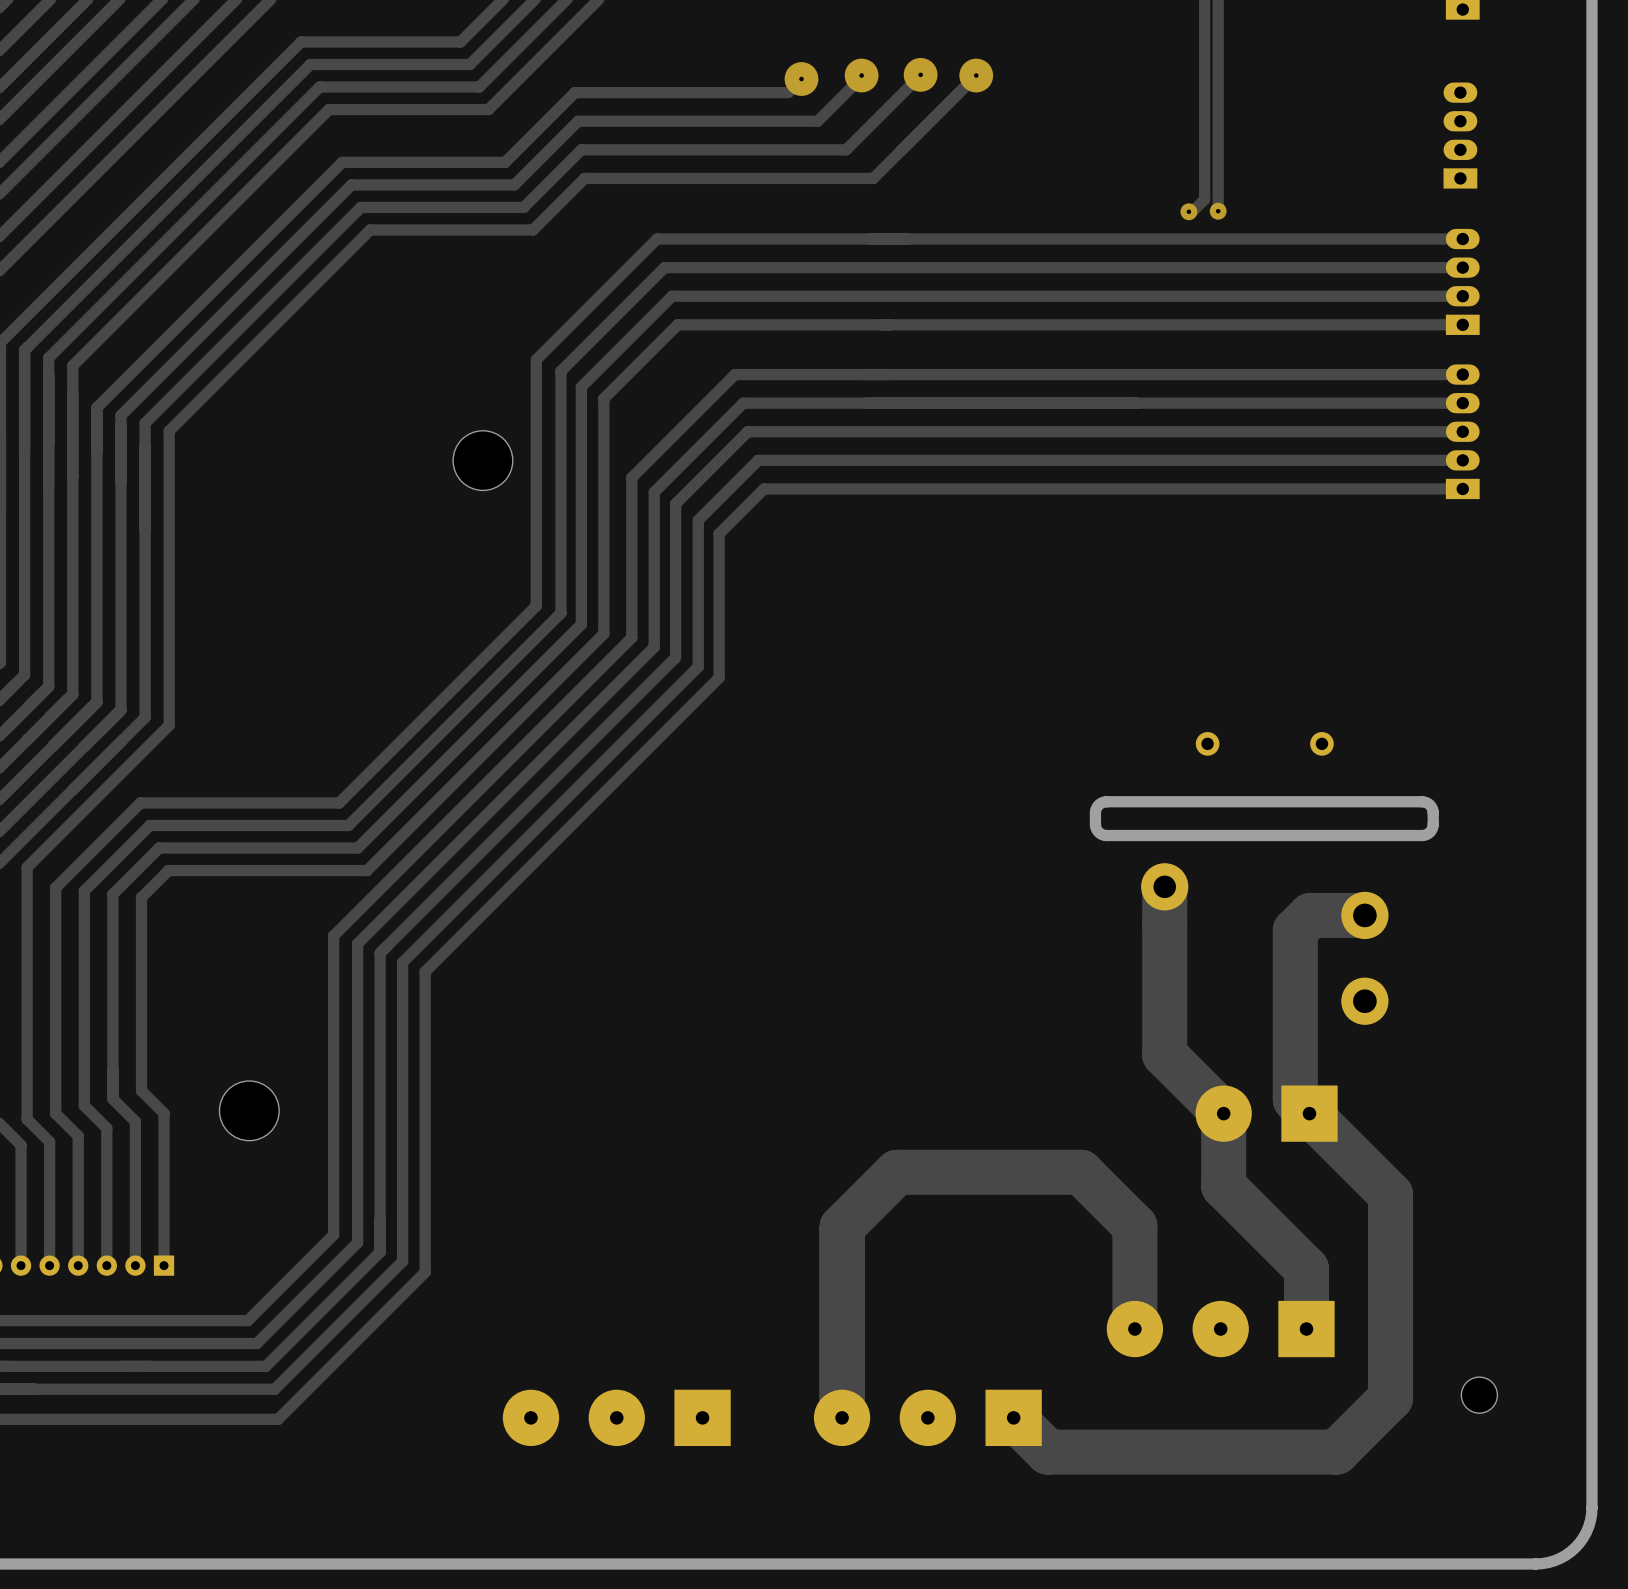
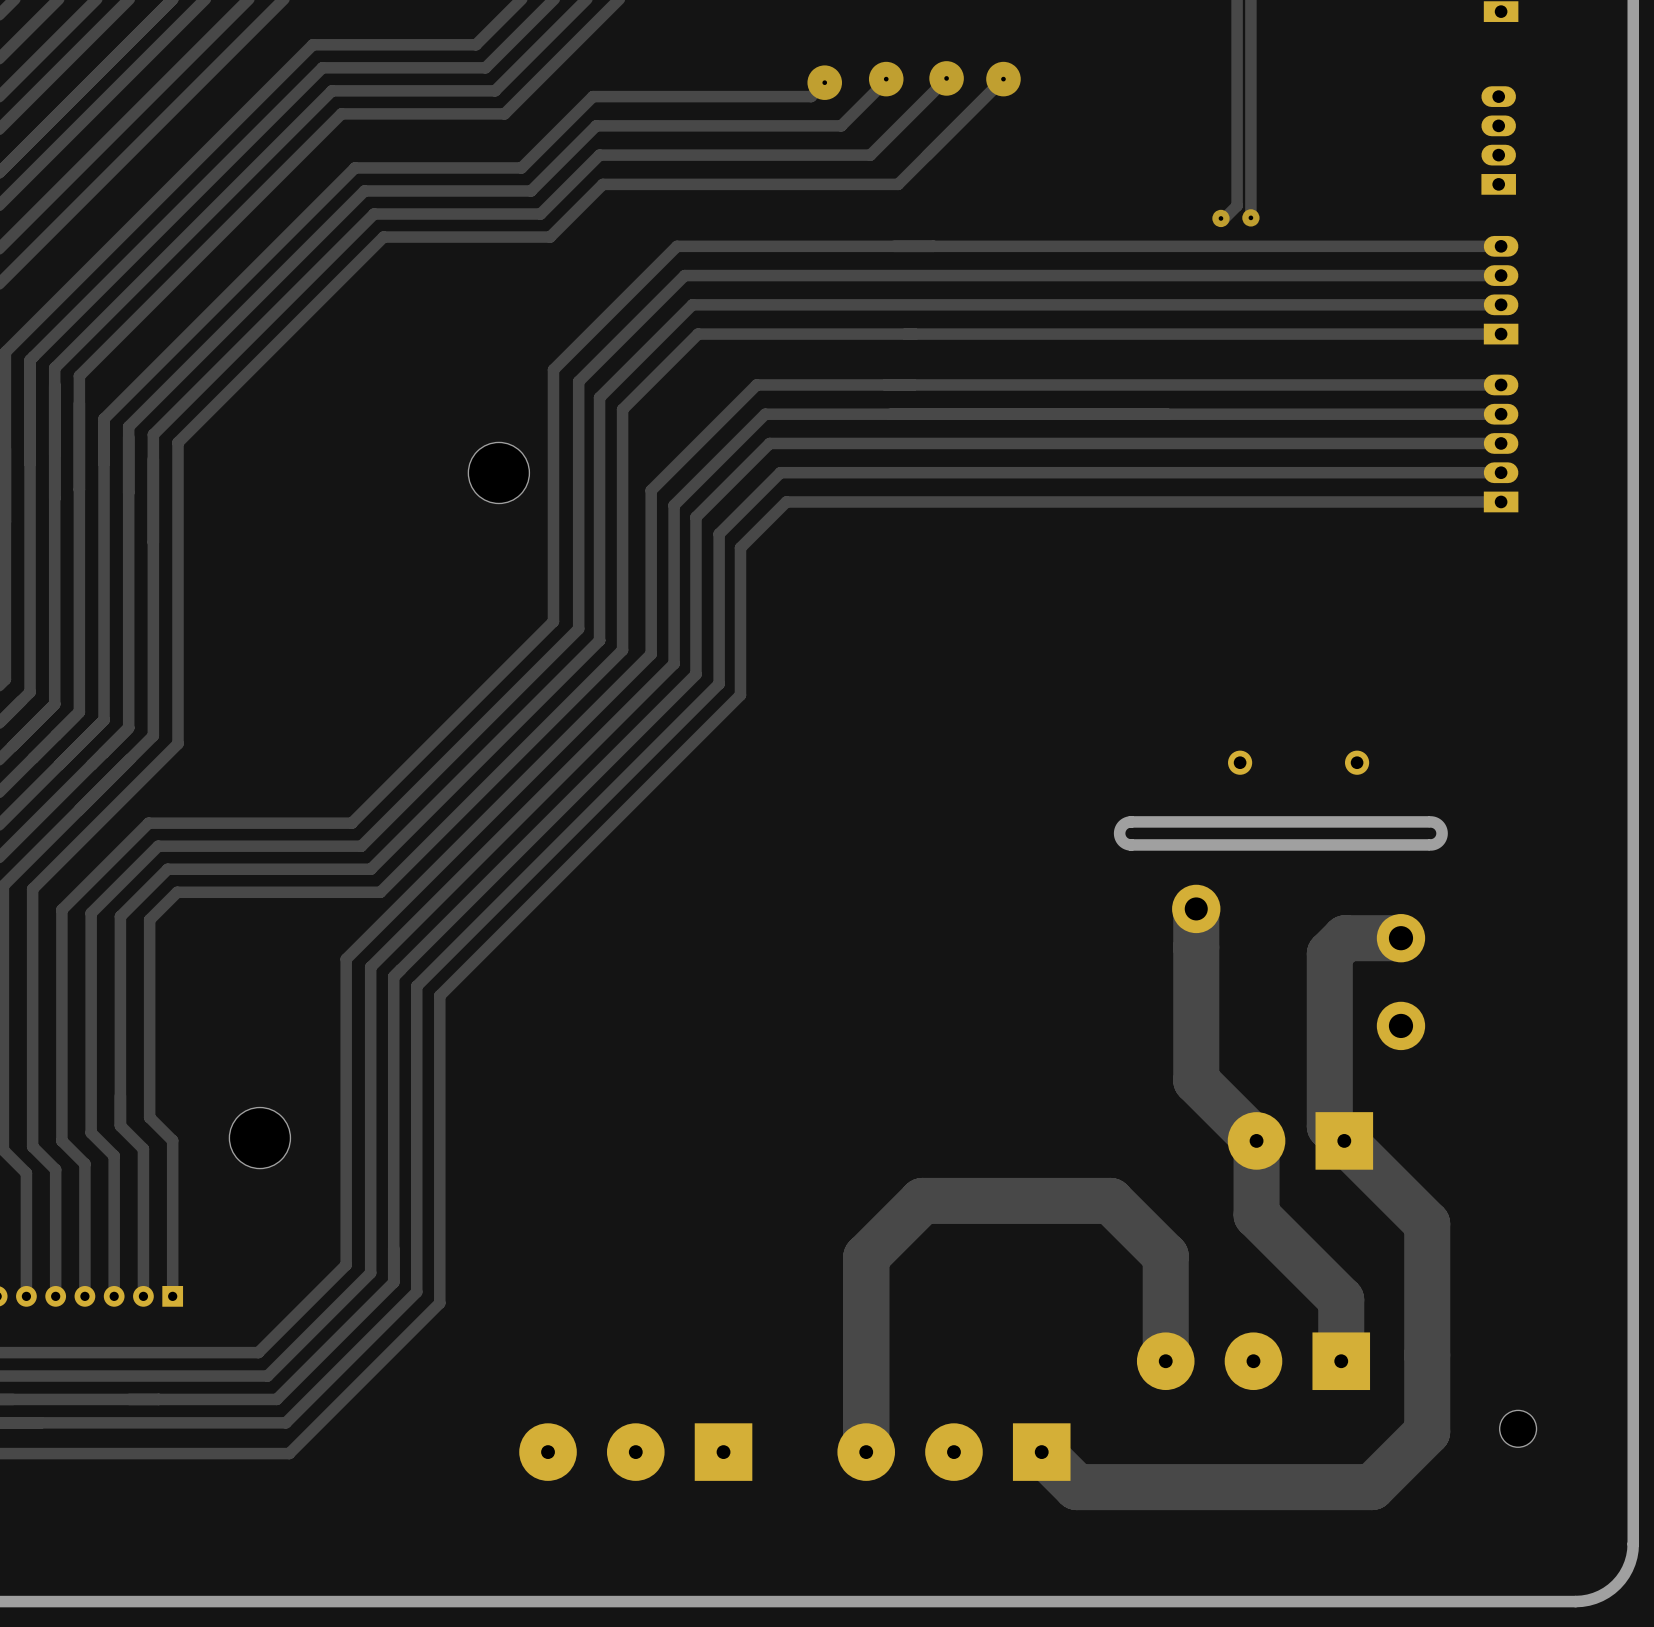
board edge: (1391, 801) (1421, 801) (1428, 804) (1433, 811) (1433, 825) (1430, 831) (1421, 835) (1105, 835) (1099, 833) (1096, 828) (1095, 813) (1098, 805) (1106, 801) -> (1427, 844) (1131, 844) (1125, 843) (1120, 836) (1121, 827) (1126, 822) (1136, 821)
board edge: none -> (1430, 821) (1438, 825) (1442, 833) (1438, 841) (1430, 844)

